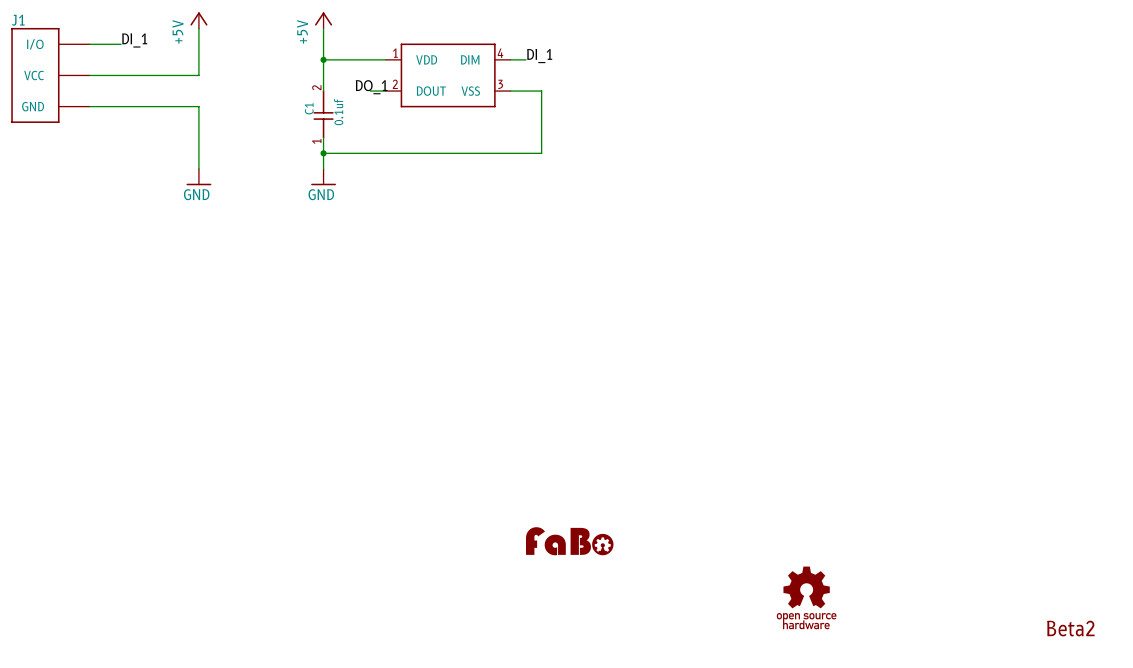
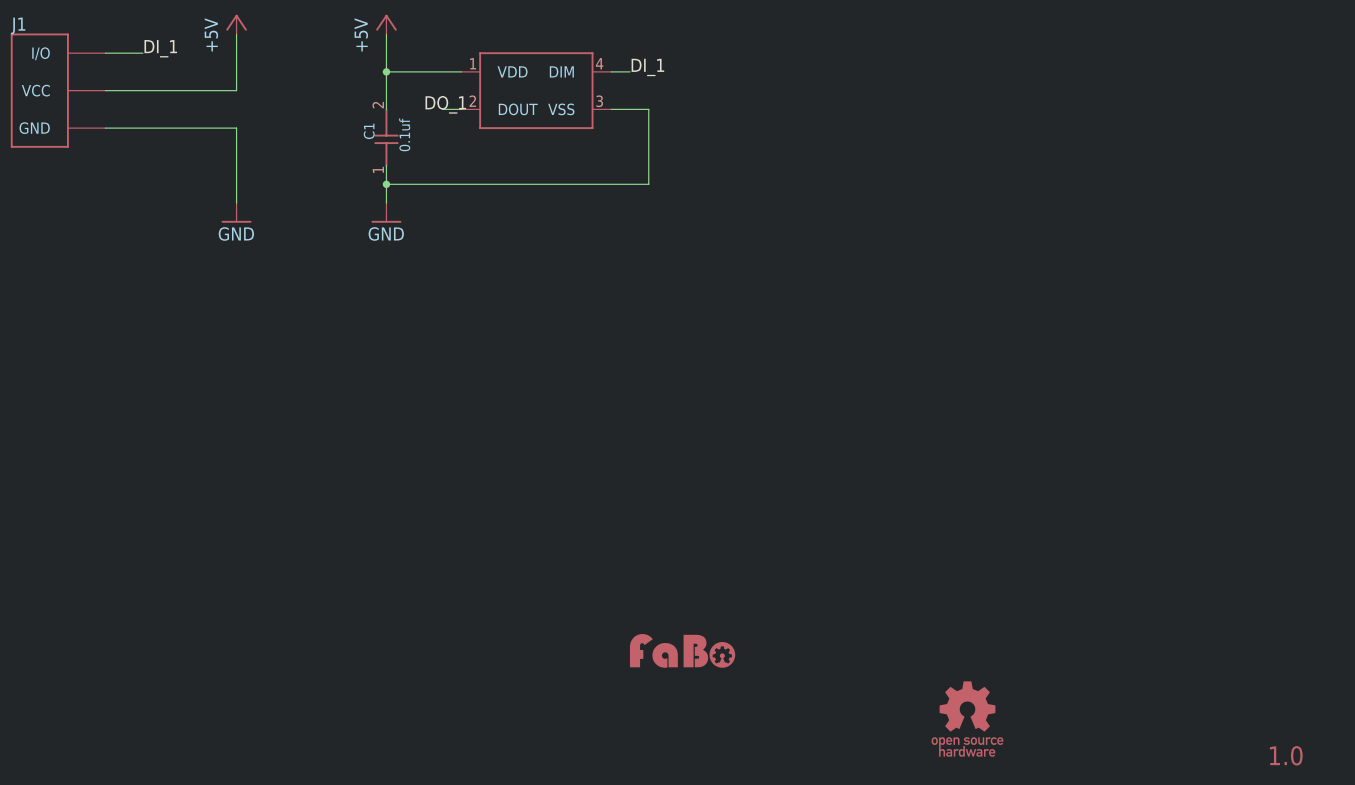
text: Beta2 (1070, 628) -> 1.0 (1286, 755)

